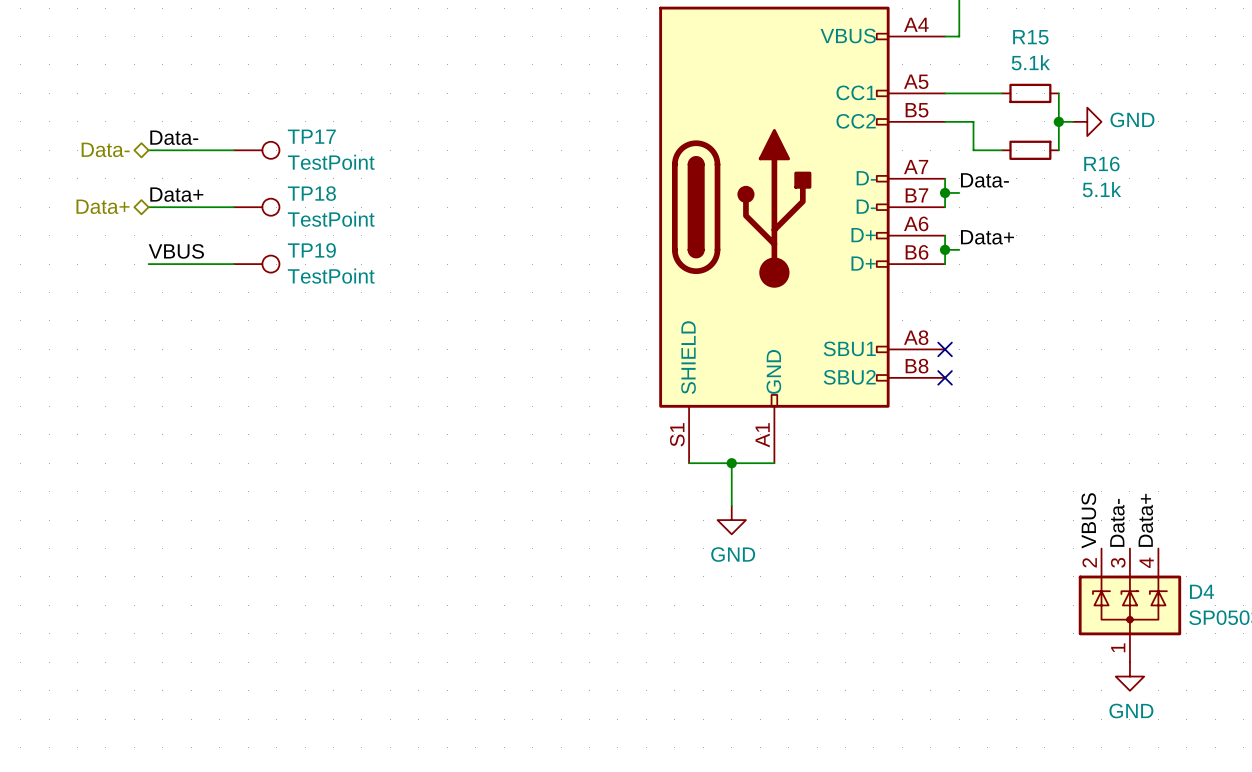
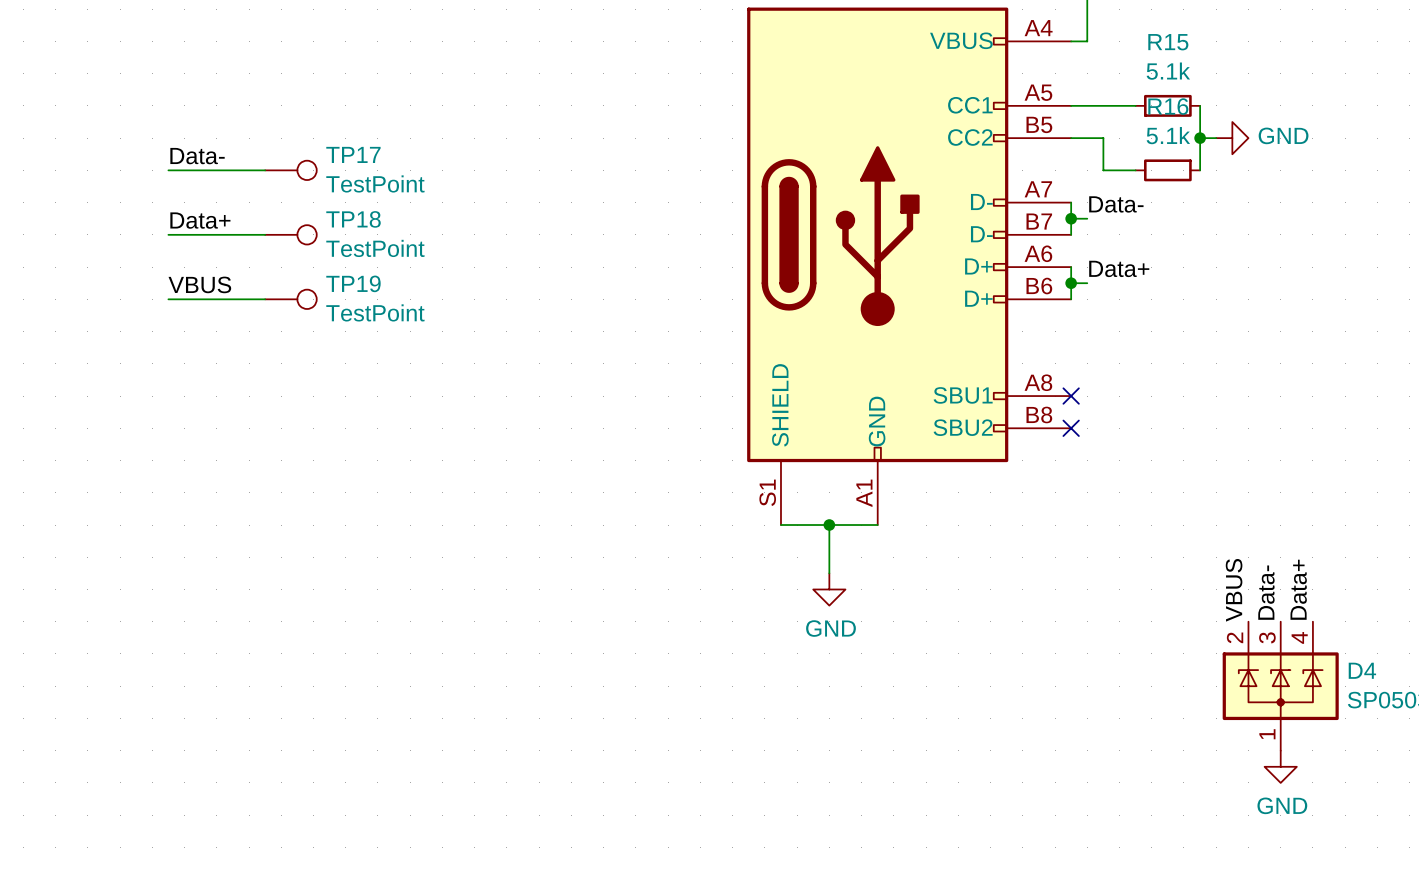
hierarchical label: Data- (105, 149) -> none
R16 name position: R16 (1101, 163) -> R16 (1168, 106)
R16 value position: 5.1k (1101, 189) -> 5.1k (1168, 135)
hierarchical label: Data+ (103, 206) -> none

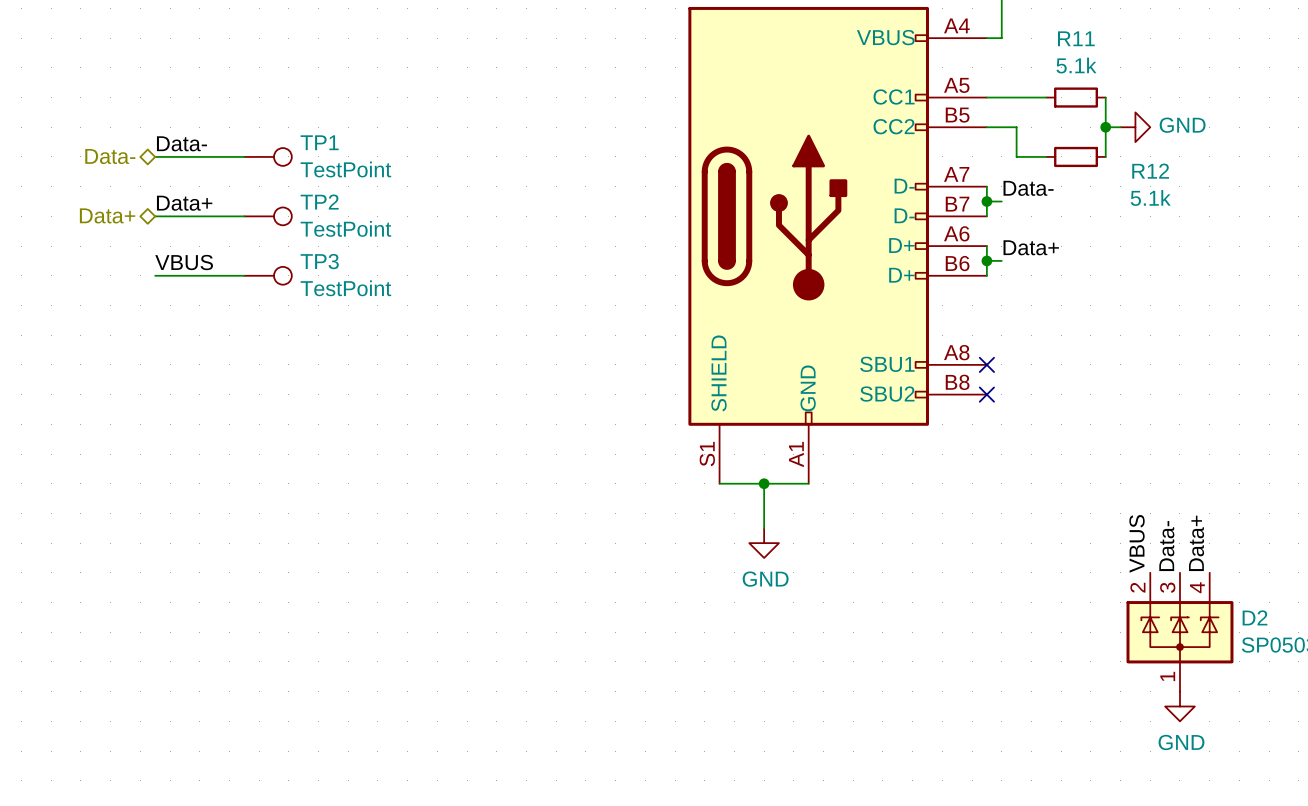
R15 name: R15 (1168, 42) -> R11 (1076, 38)
R16 name: R16 (1168, 106) -> R12 (1150, 171)
R16 value position: 5.1k (1168, 135) -> 5.1k (1150, 198)
TP17 name: TP17 (353, 154) -> TP1 (319, 142)
hierarchical label: none -> Data- (110, 156)
TP18 name: TP18 (353, 219) -> TP2 (319, 202)
hierarchical label: none -> Data+ (107, 215)
TP19 name: TP19 (353, 283) -> TP3 (319, 261)
D4 name: D4 (1362, 670) -> D2 (1255, 617)

